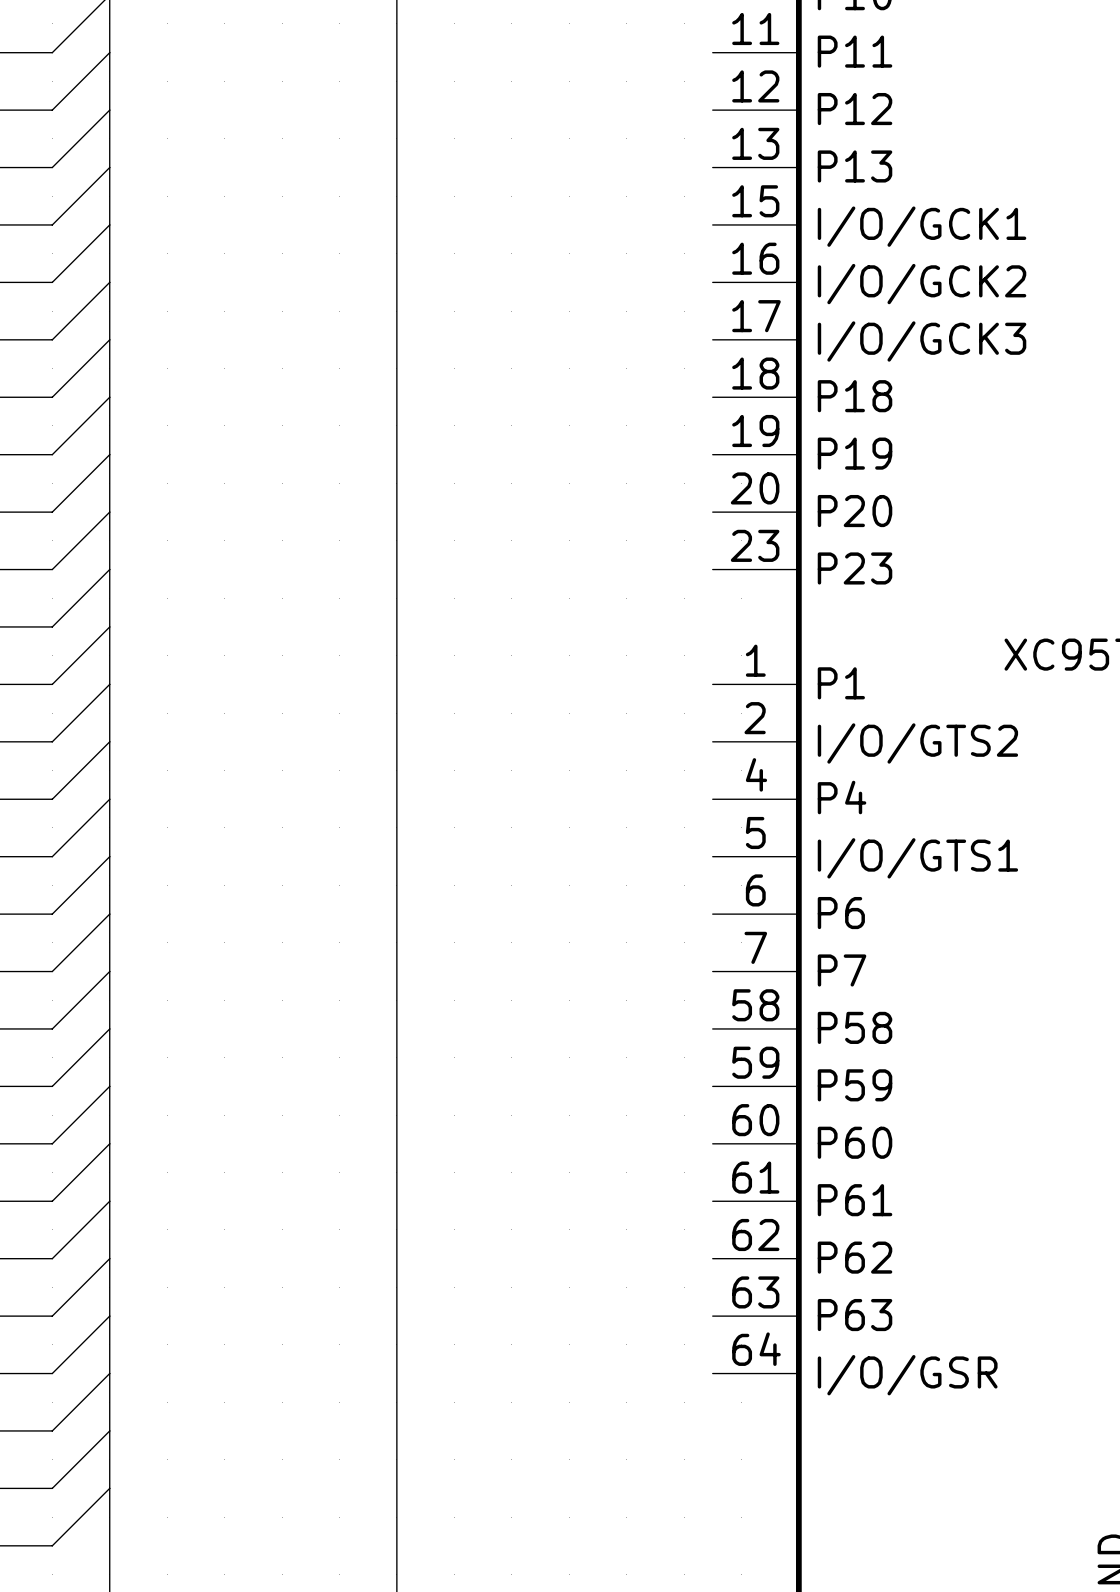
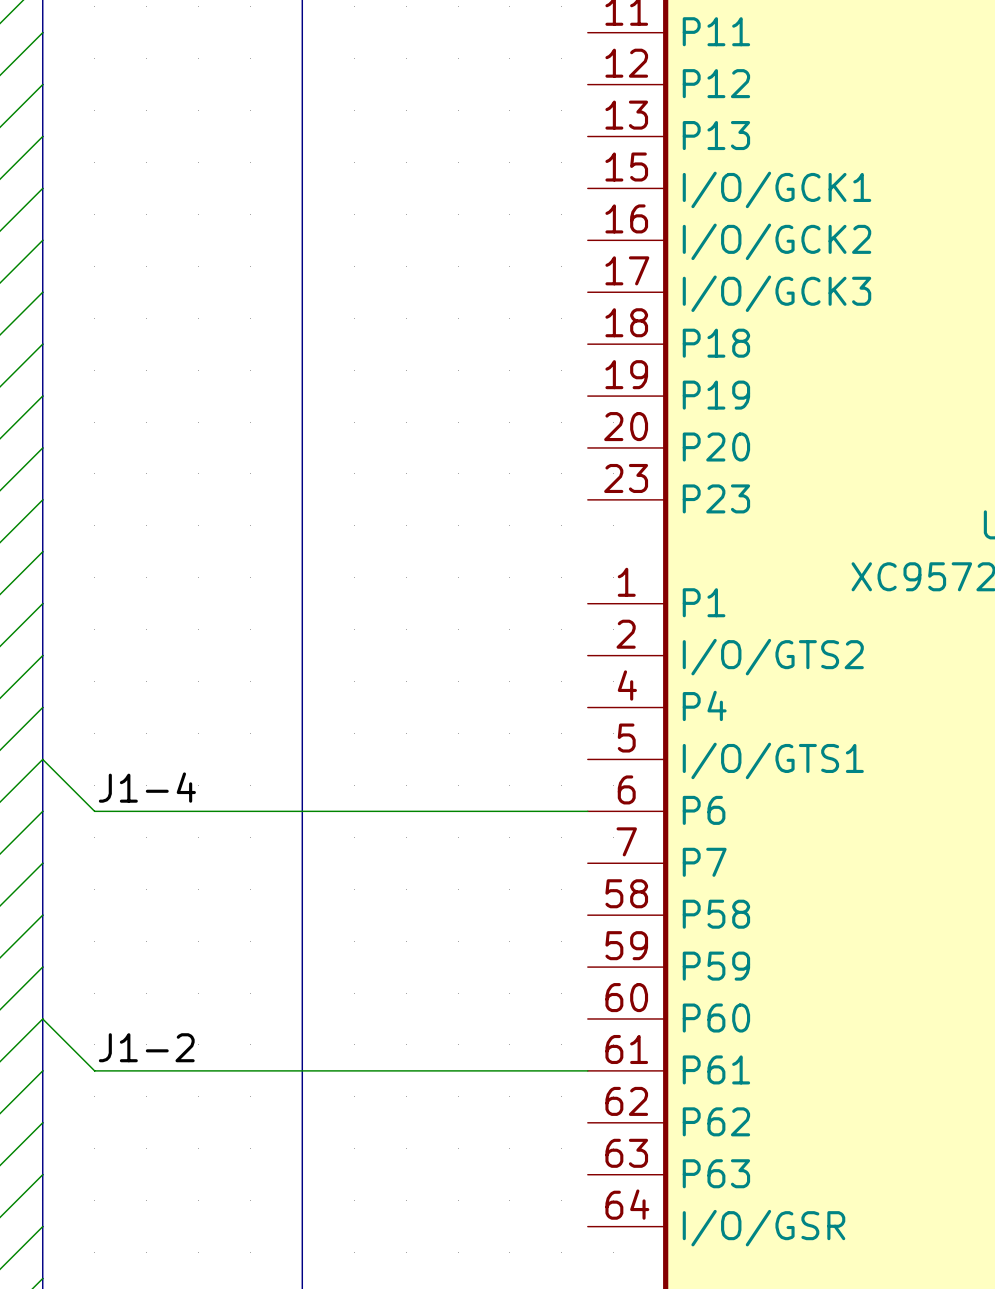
wire: none -> (42, 759) (94, 811) (587, 811)
label: none -> J1-4 (147, 787)
wire: none -> (42, 1018) (94, 1070) (587, 1070)
label: none -> J1-2 (146, 1047)

